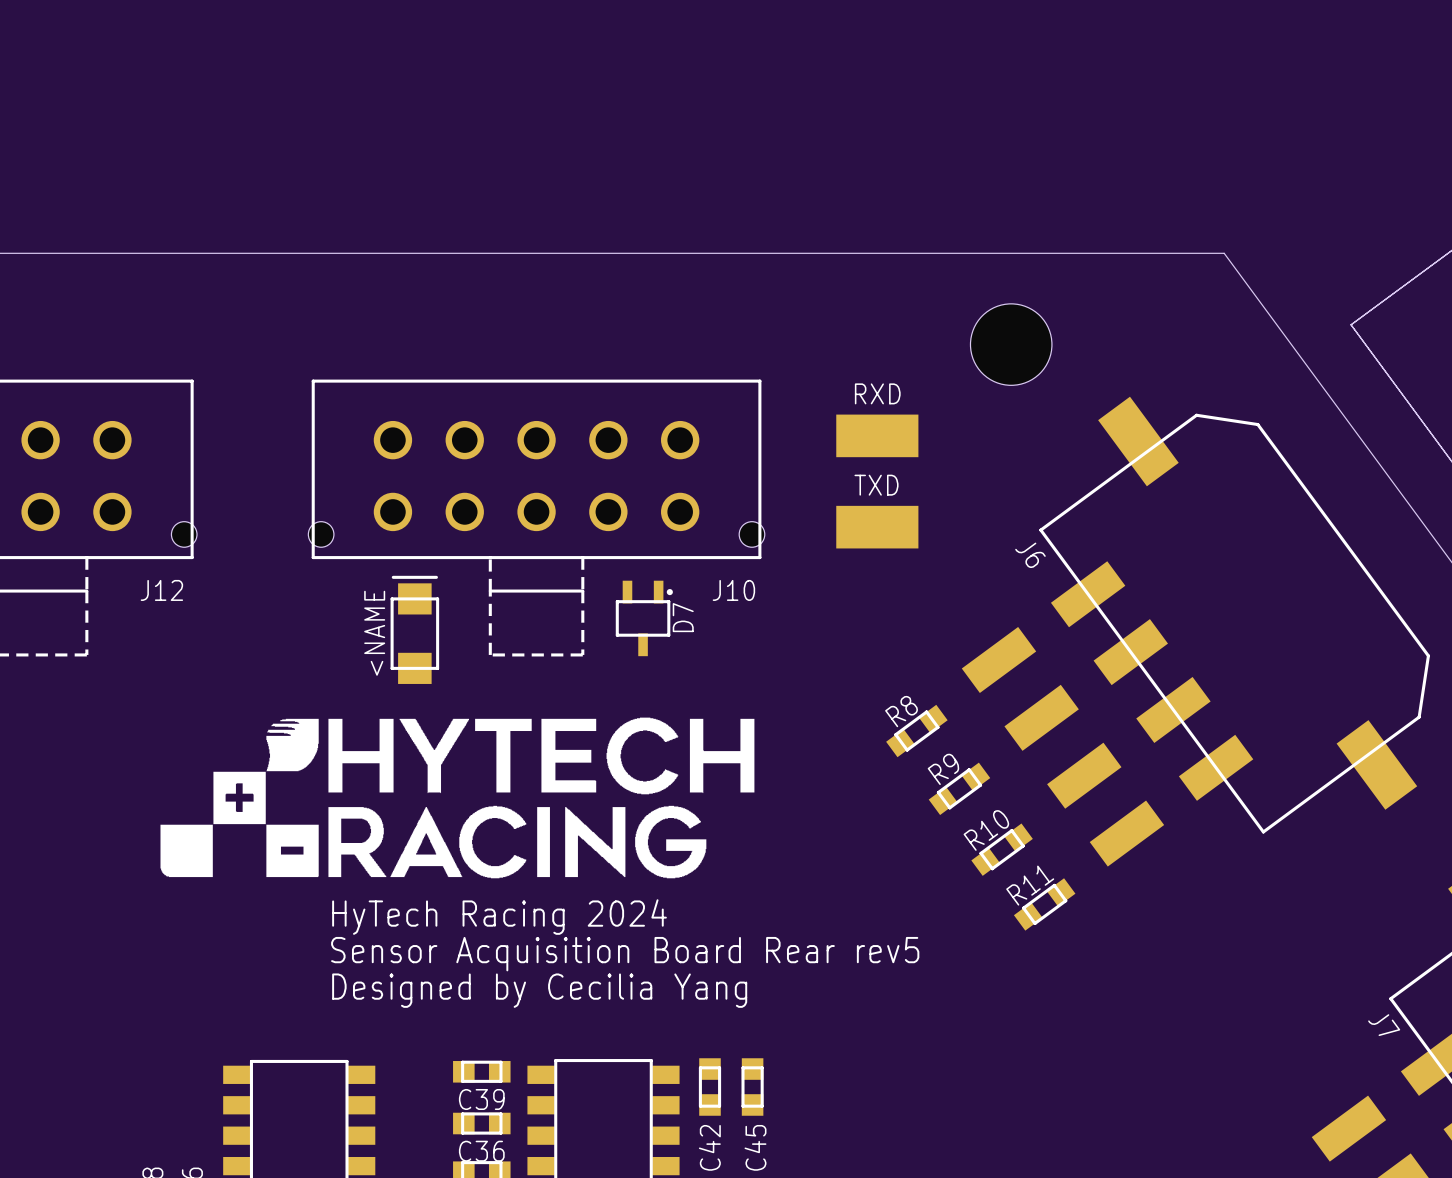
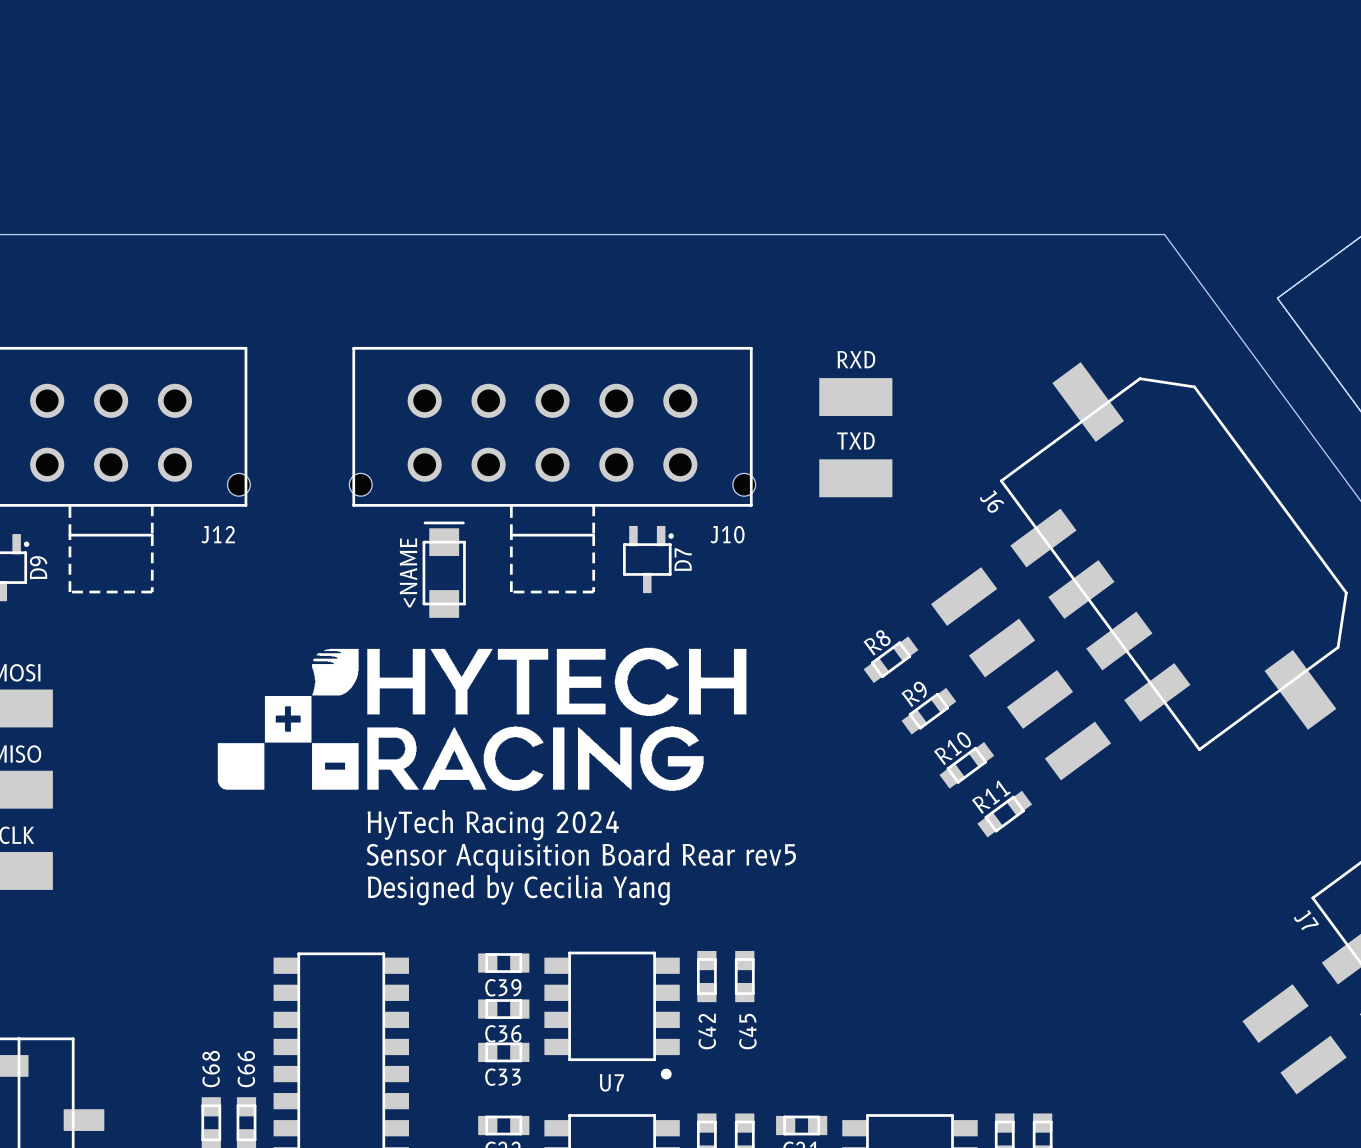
part: (1011, 344) -> none

